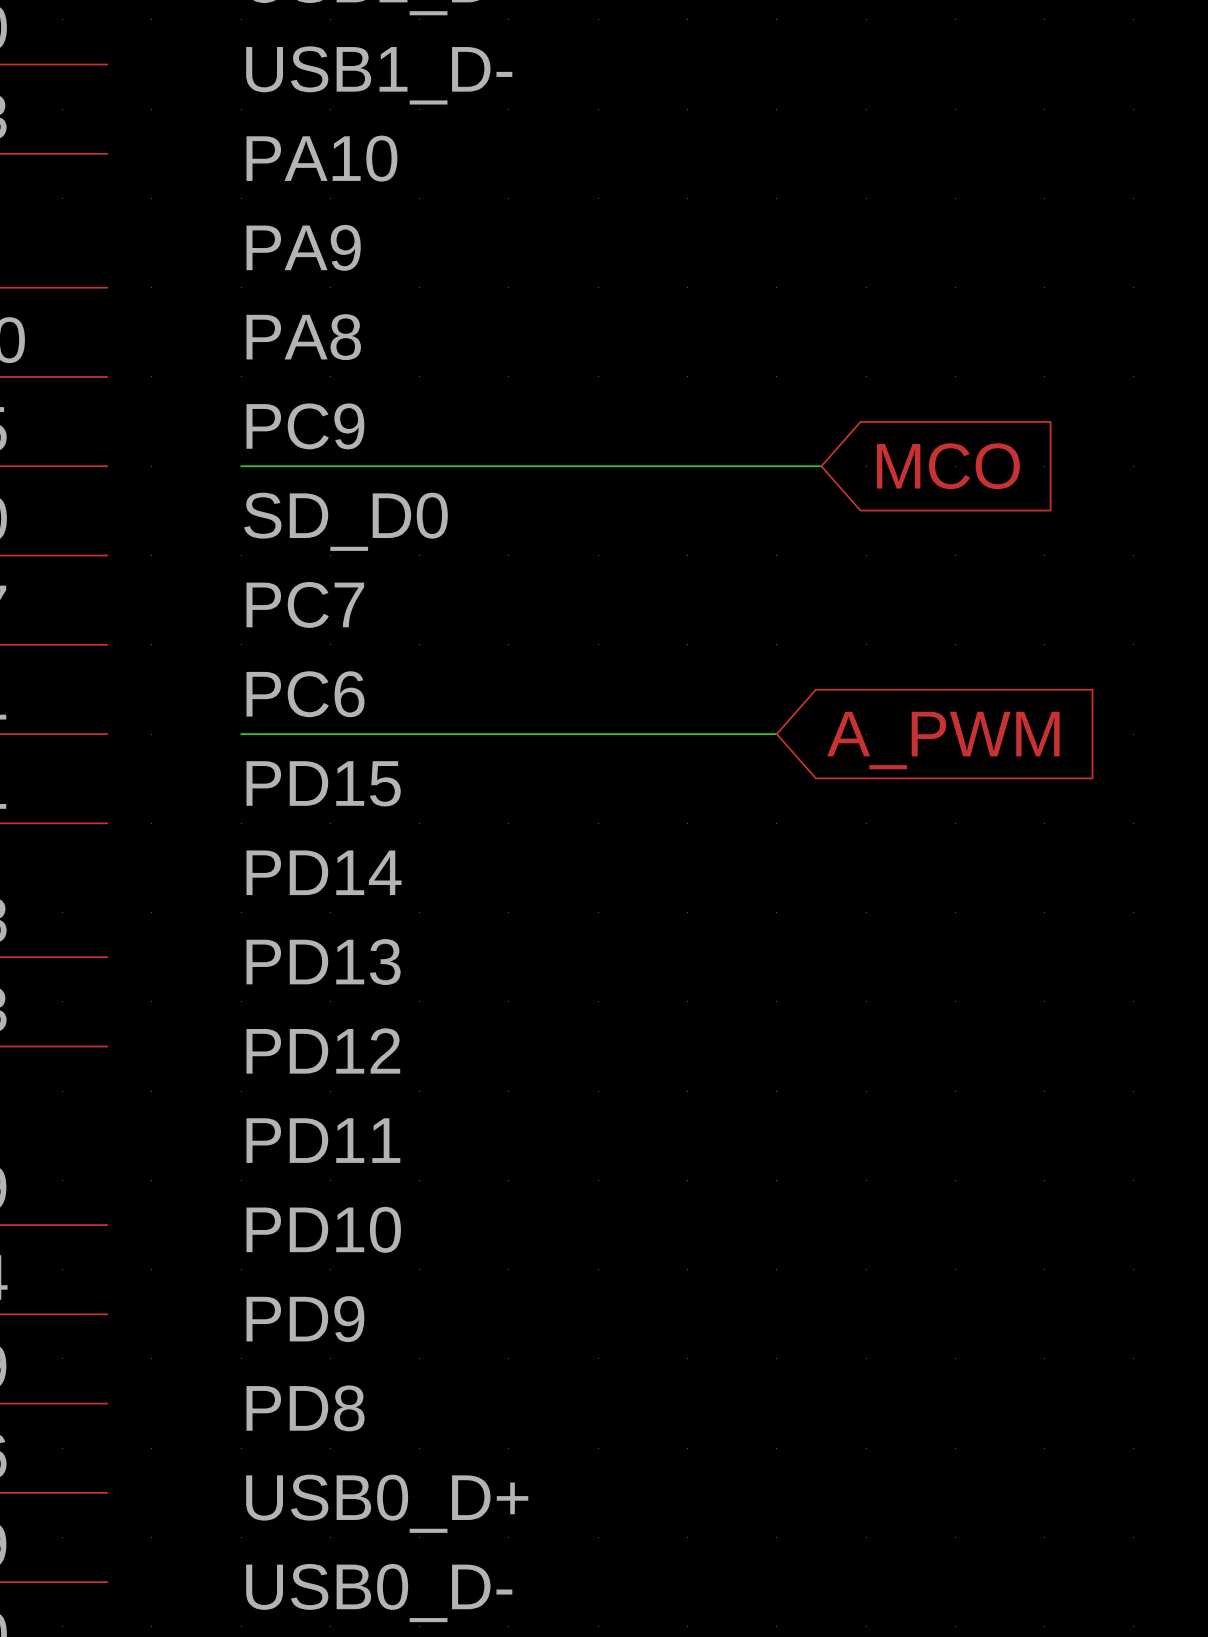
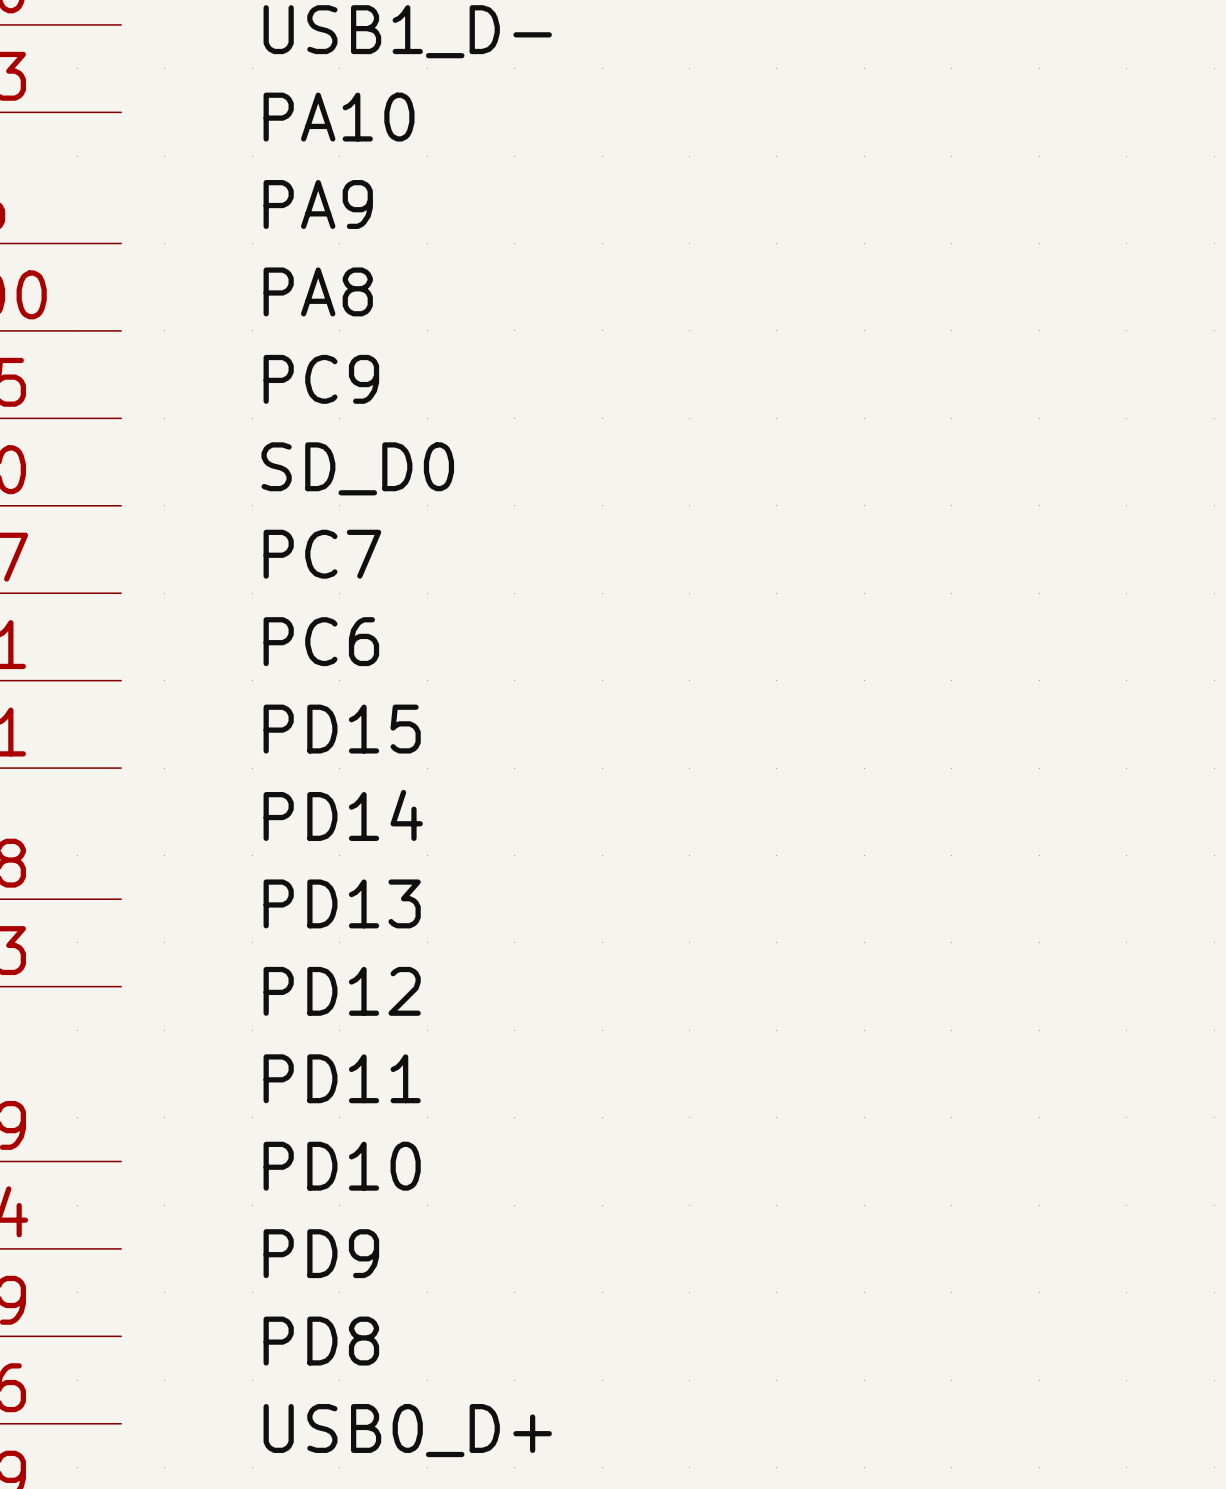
wire: (241, 466) (821, 466) -> none
global label: MCO (948, 466) -> none
wire: (241, 734) (776, 734) -> none
global label: A_PWM (943, 740) -> none

